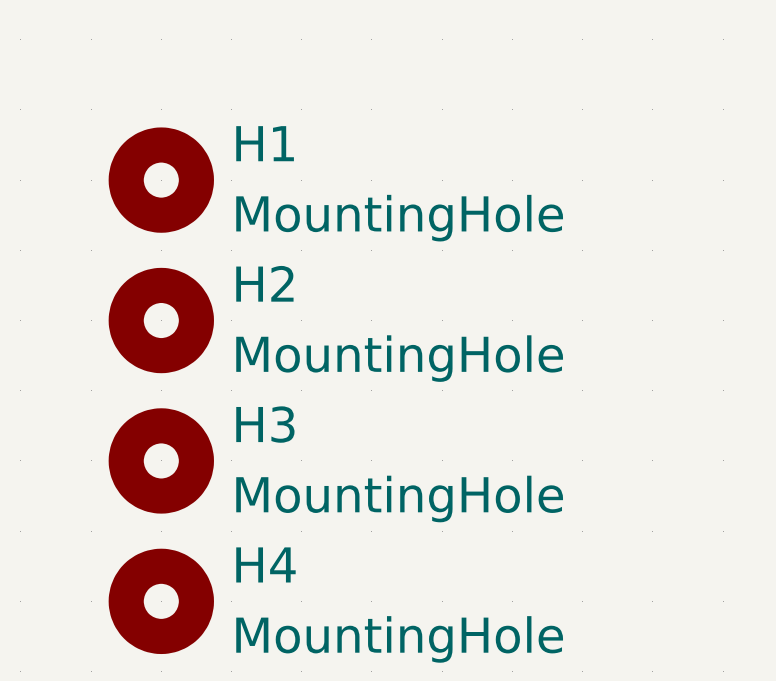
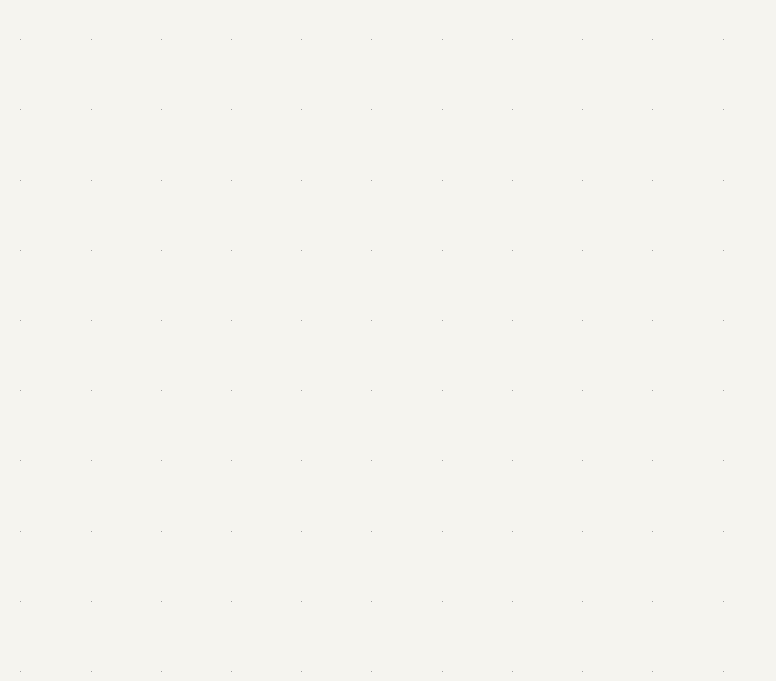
H1: MountingHole (161, 180) -> none
H2: MountingHole (161, 320) -> none
H3: MountingHole (161, 460) -> none
H4: MountingHole (161, 601) -> none

